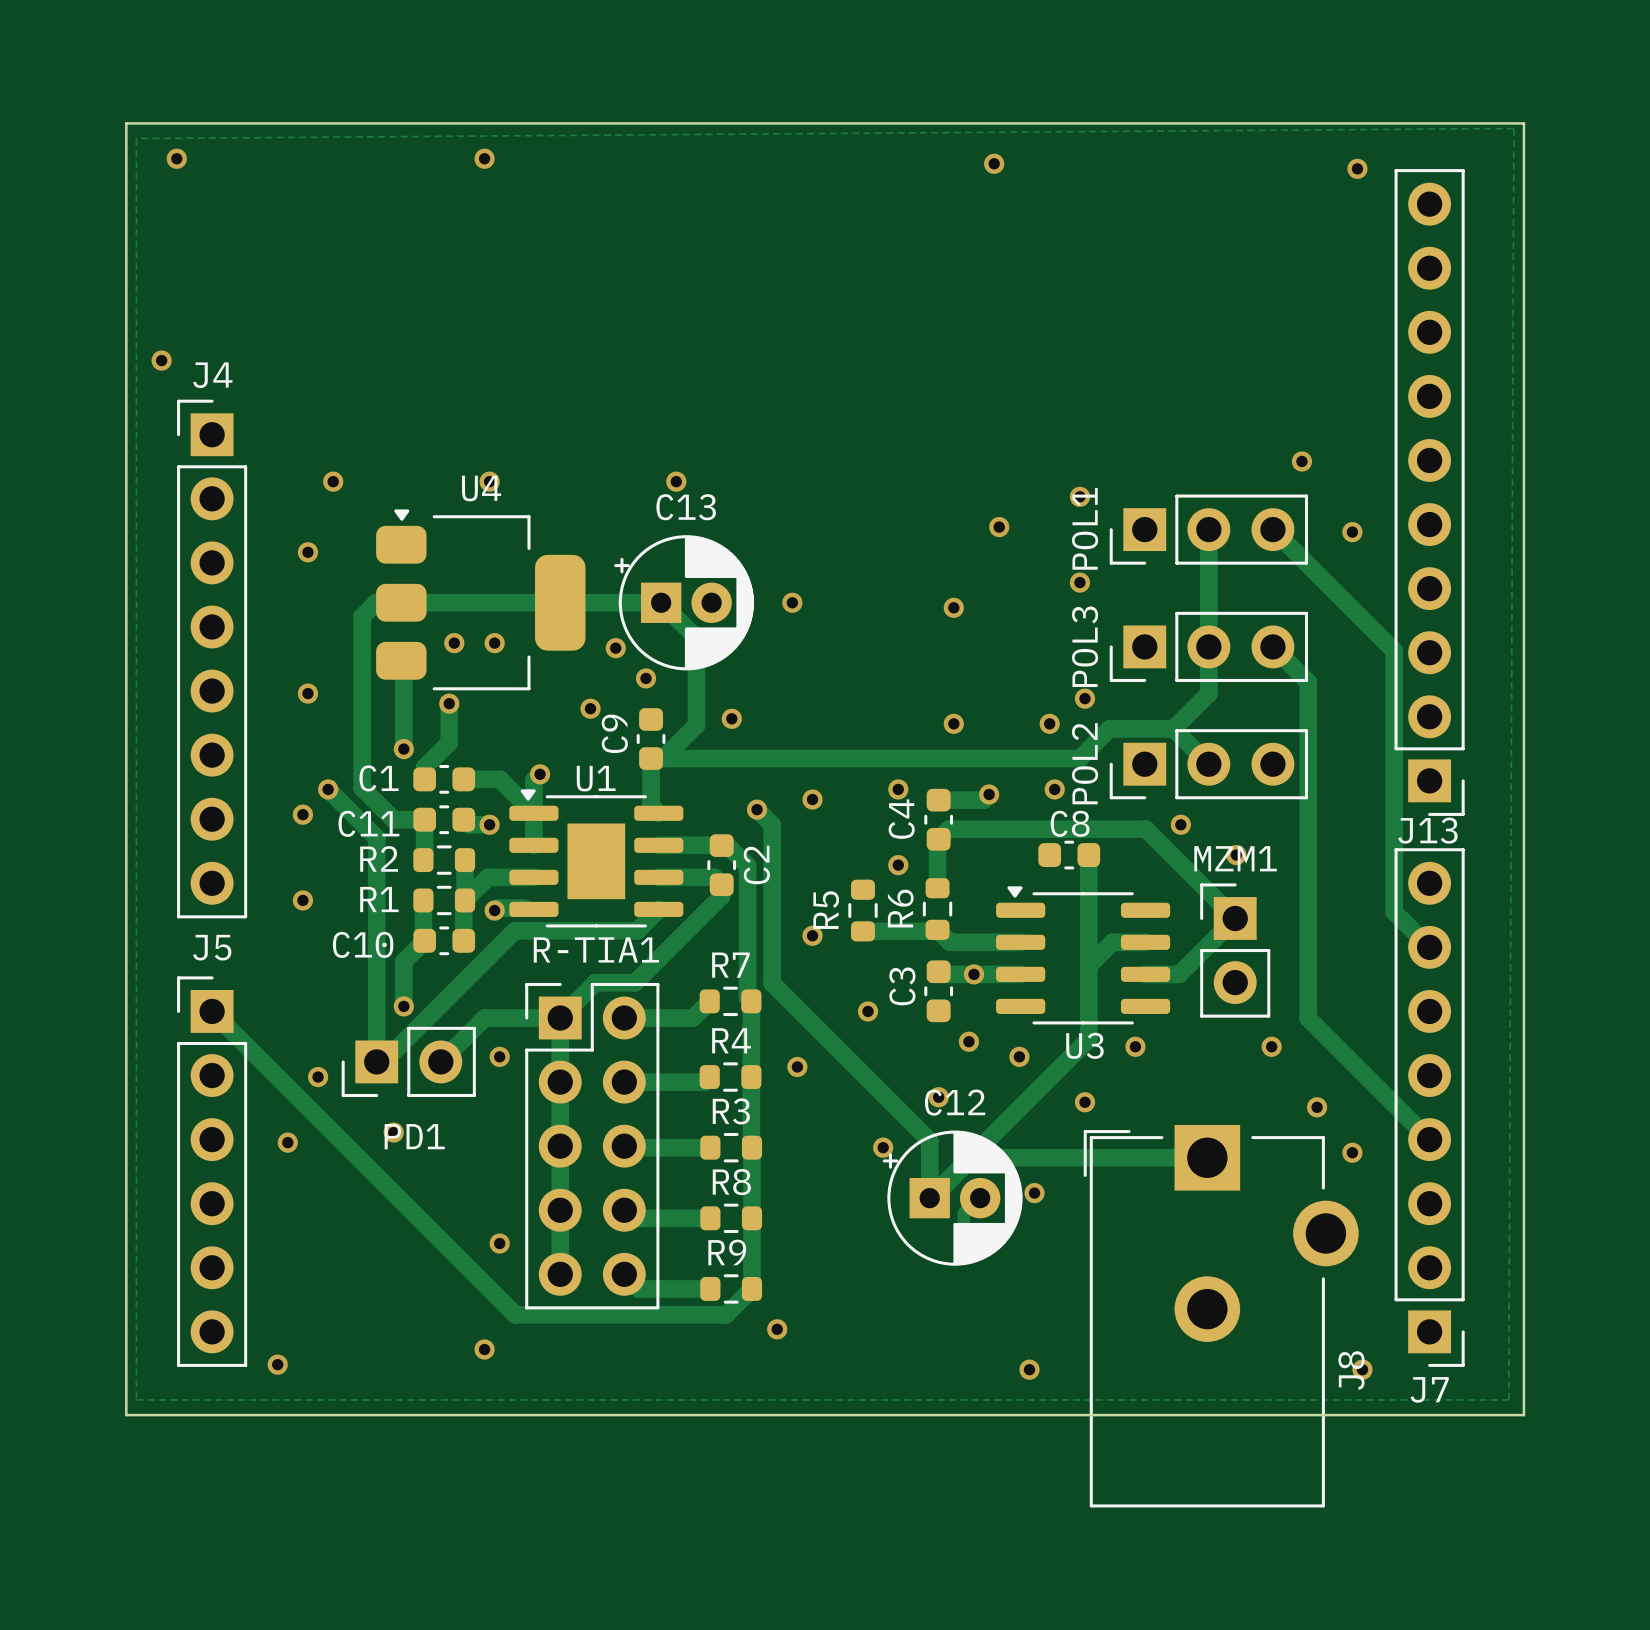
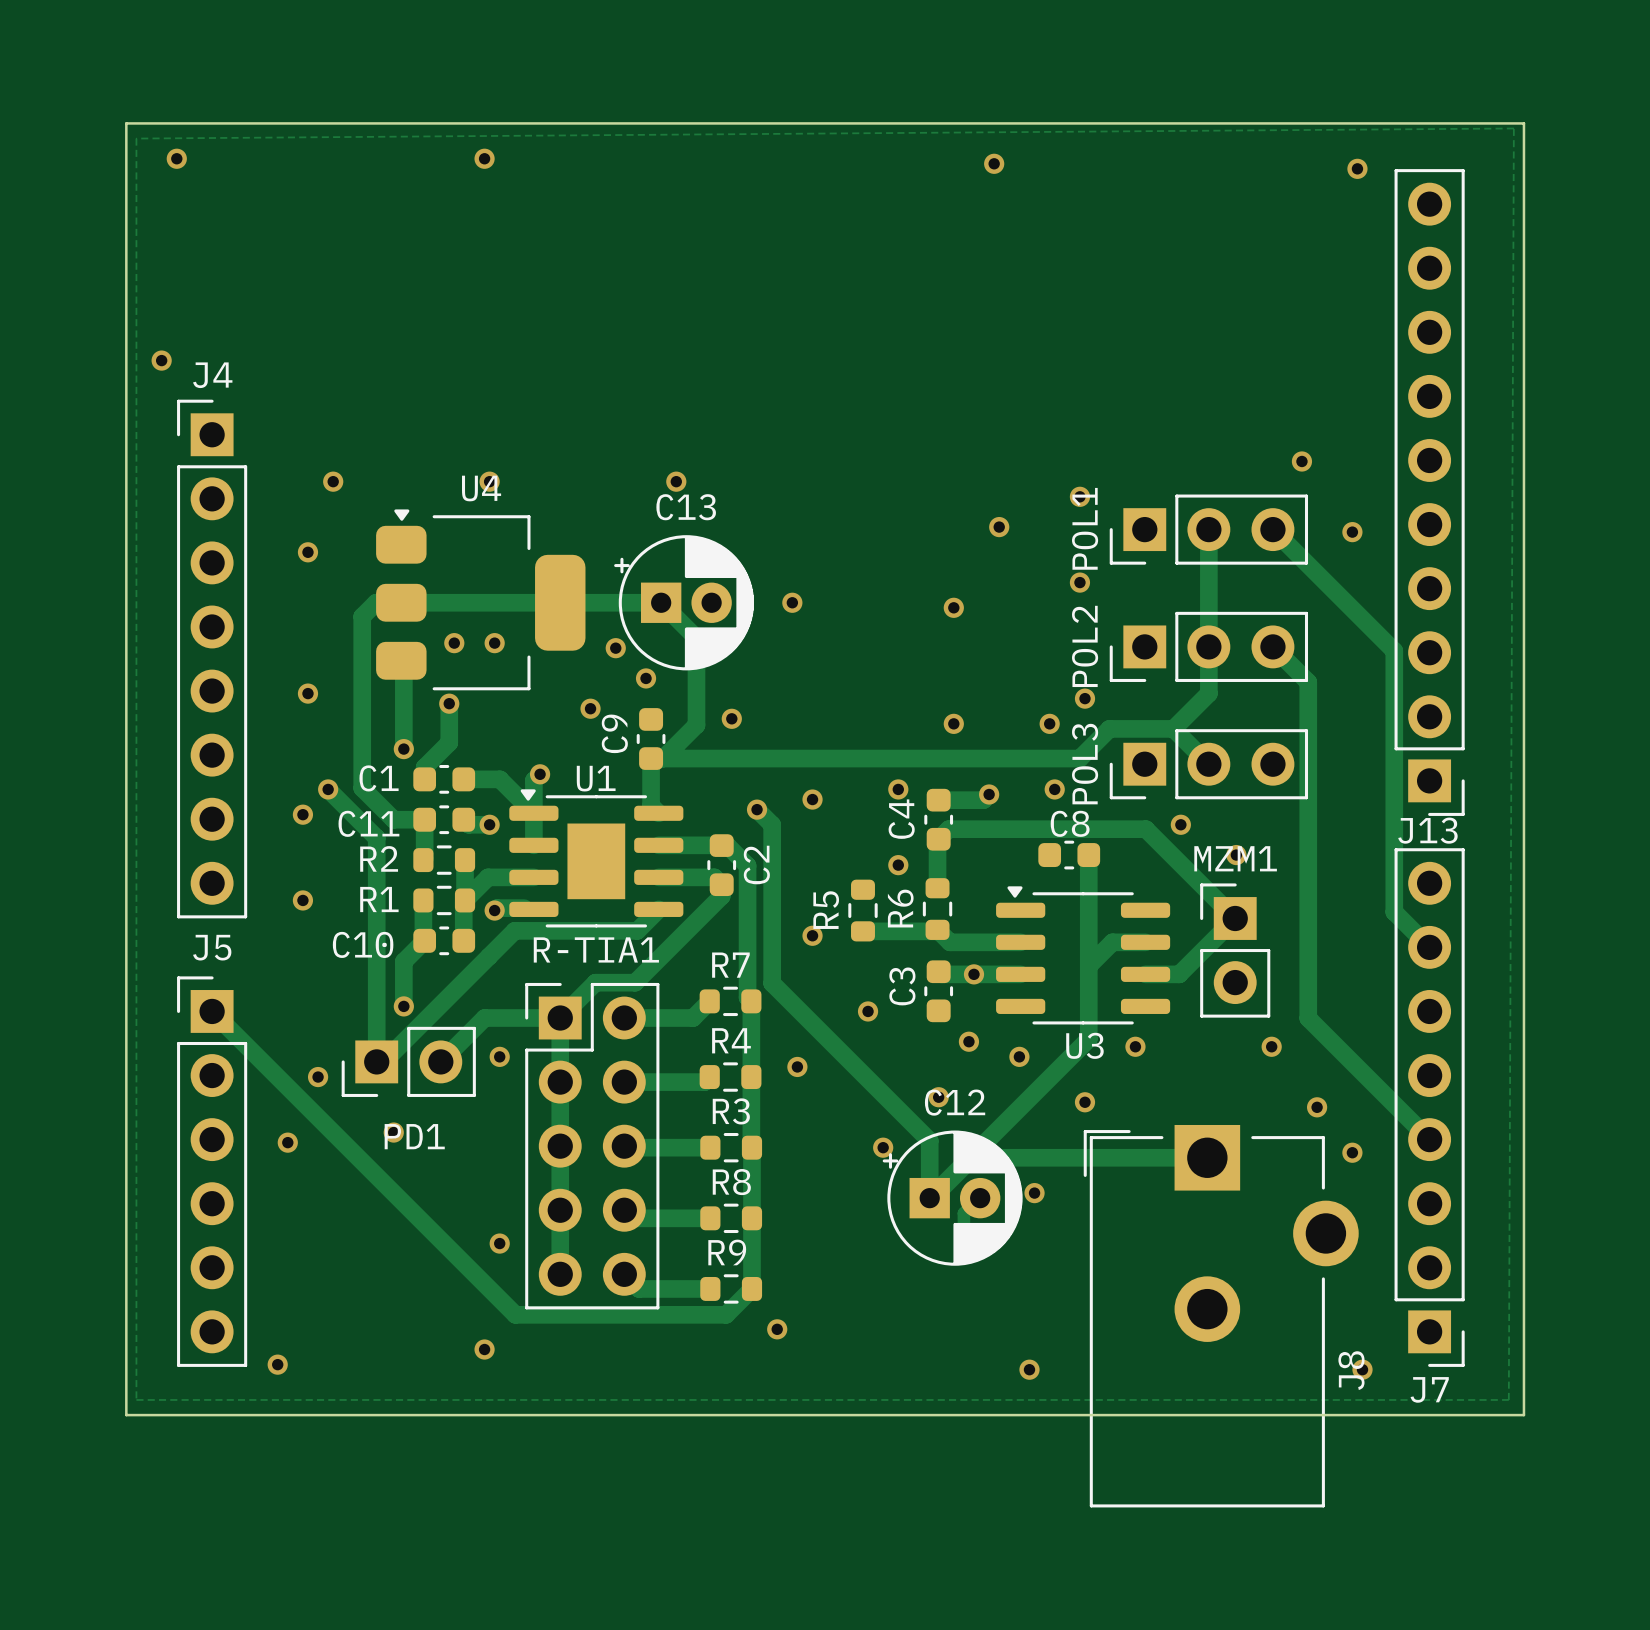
POL3 name: POL3 (1085, 646) -> POL2 (1085, 646)
POL2 name: POL2 (1085, 763) -> POL3 (1085, 764)

